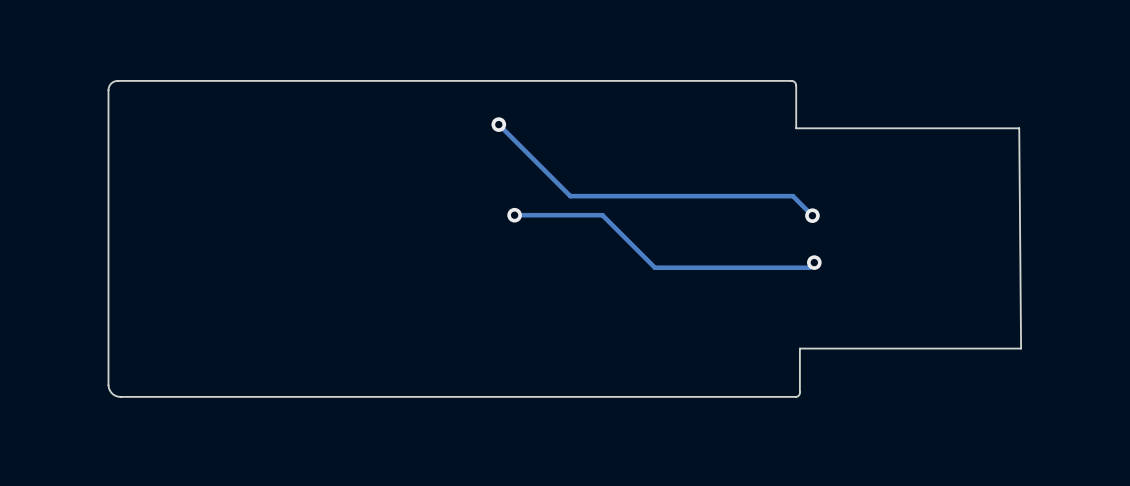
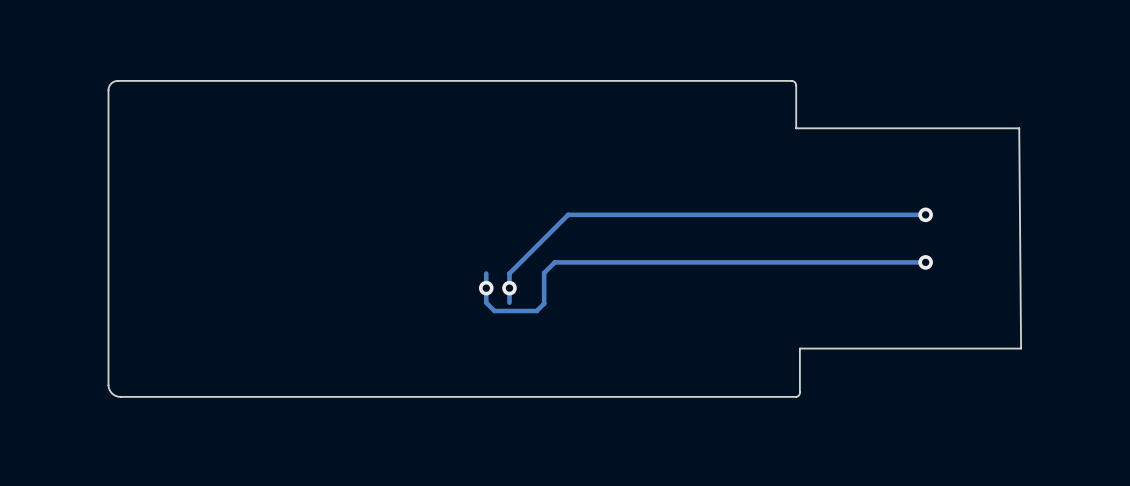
track: (498, 124) (570, 196) (792, 196) (812, 215) -> none
via: (498, 124) -> none
track: none -> (925, 214) (568, 214) (509, 273) (509, 302)
via: none -> (925, 214)
track: (514, 215) (602, 215) (654, 267) (809, 267) (814, 262) -> none
via: (514, 215) -> none
via: (812, 215) -> none
via: (814, 262) -> none
track: none -> (925, 262) (554, 262) (544, 273) (544, 303) (536, 311) (494, 311) (486, 302) (486, 273)
via: none -> (925, 262)
via: none -> (486, 288)
via: none -> (509, 288)

